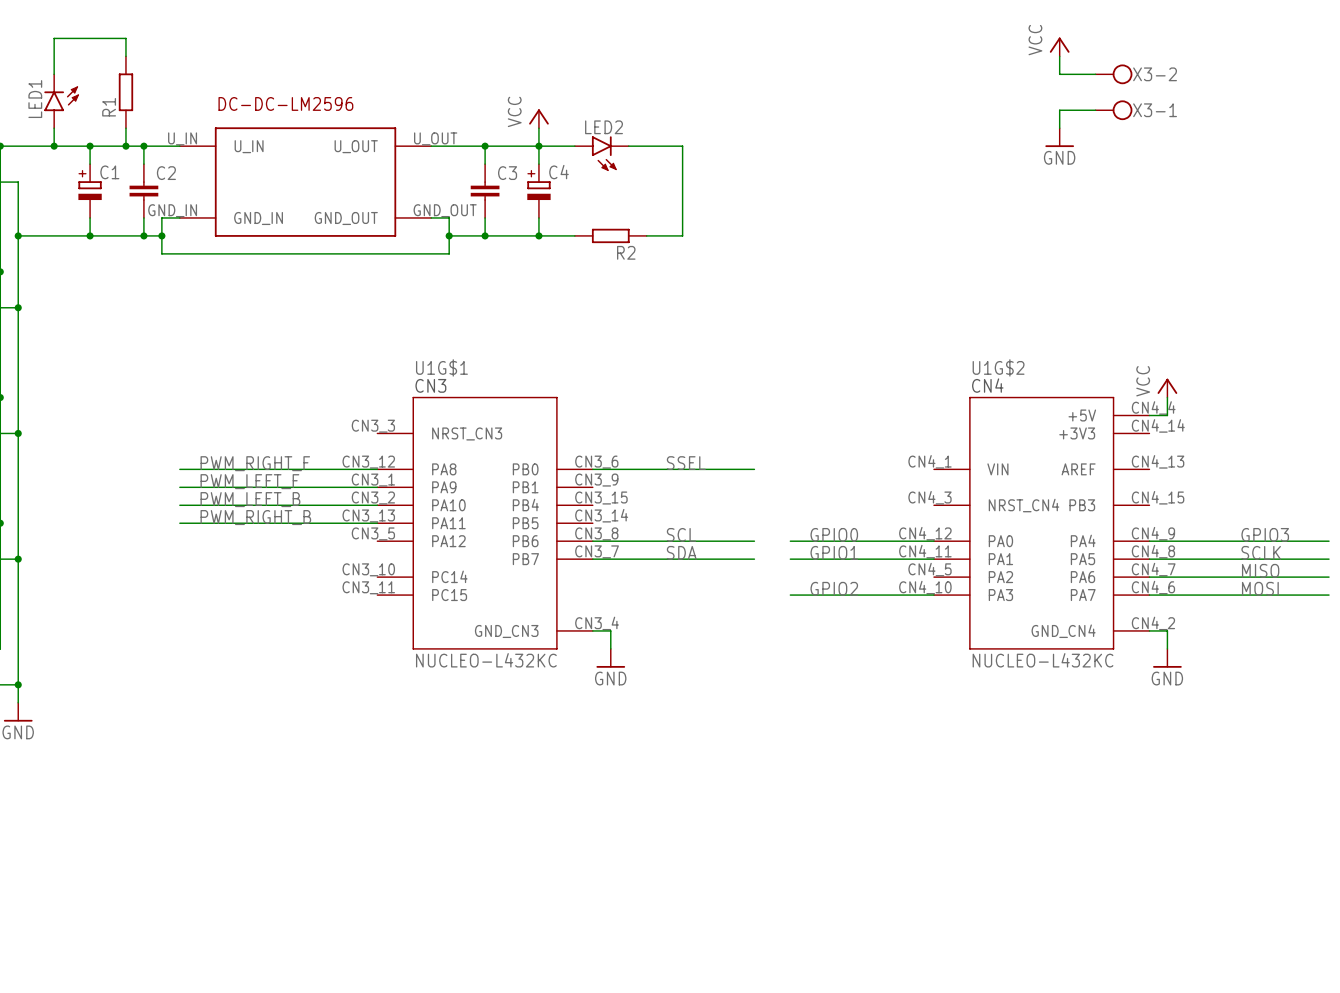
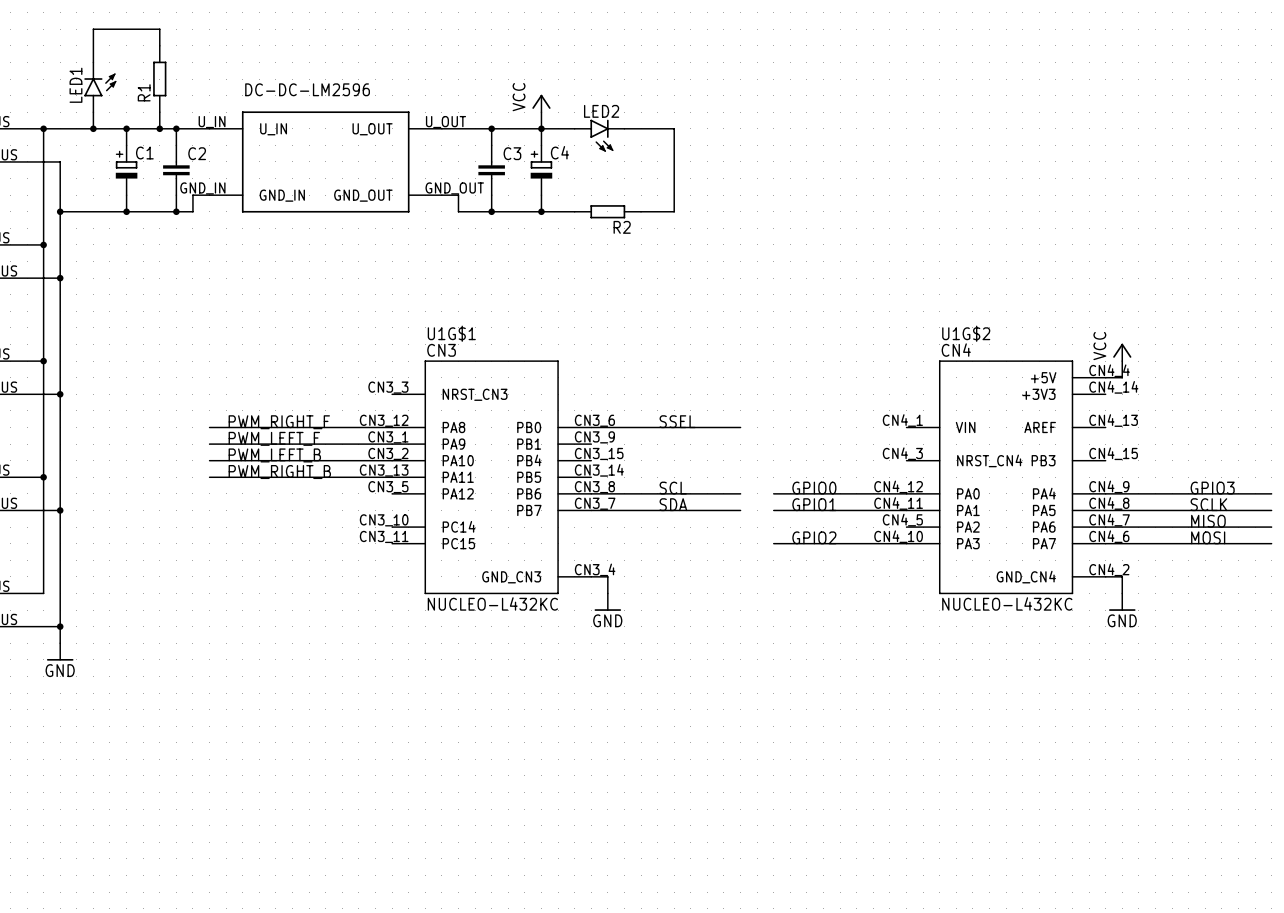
power symbol: VCC (1059, 46) -> none
wire: (1059, 56) (1059, 74) (1095, 74) -> none
X3-2: (1113, 74) -> none
wire: (1095, 110) (1059, 110) (1059, 128) -> none
X3-1: (1113, 110) -> none
power symbol: GND (1059, 137) -> none
wire: (161, 235) (161, 253) (449, 253) (449, 235) -> none
junction: (161, 235) -> none
junction: (449, 235) -> none

